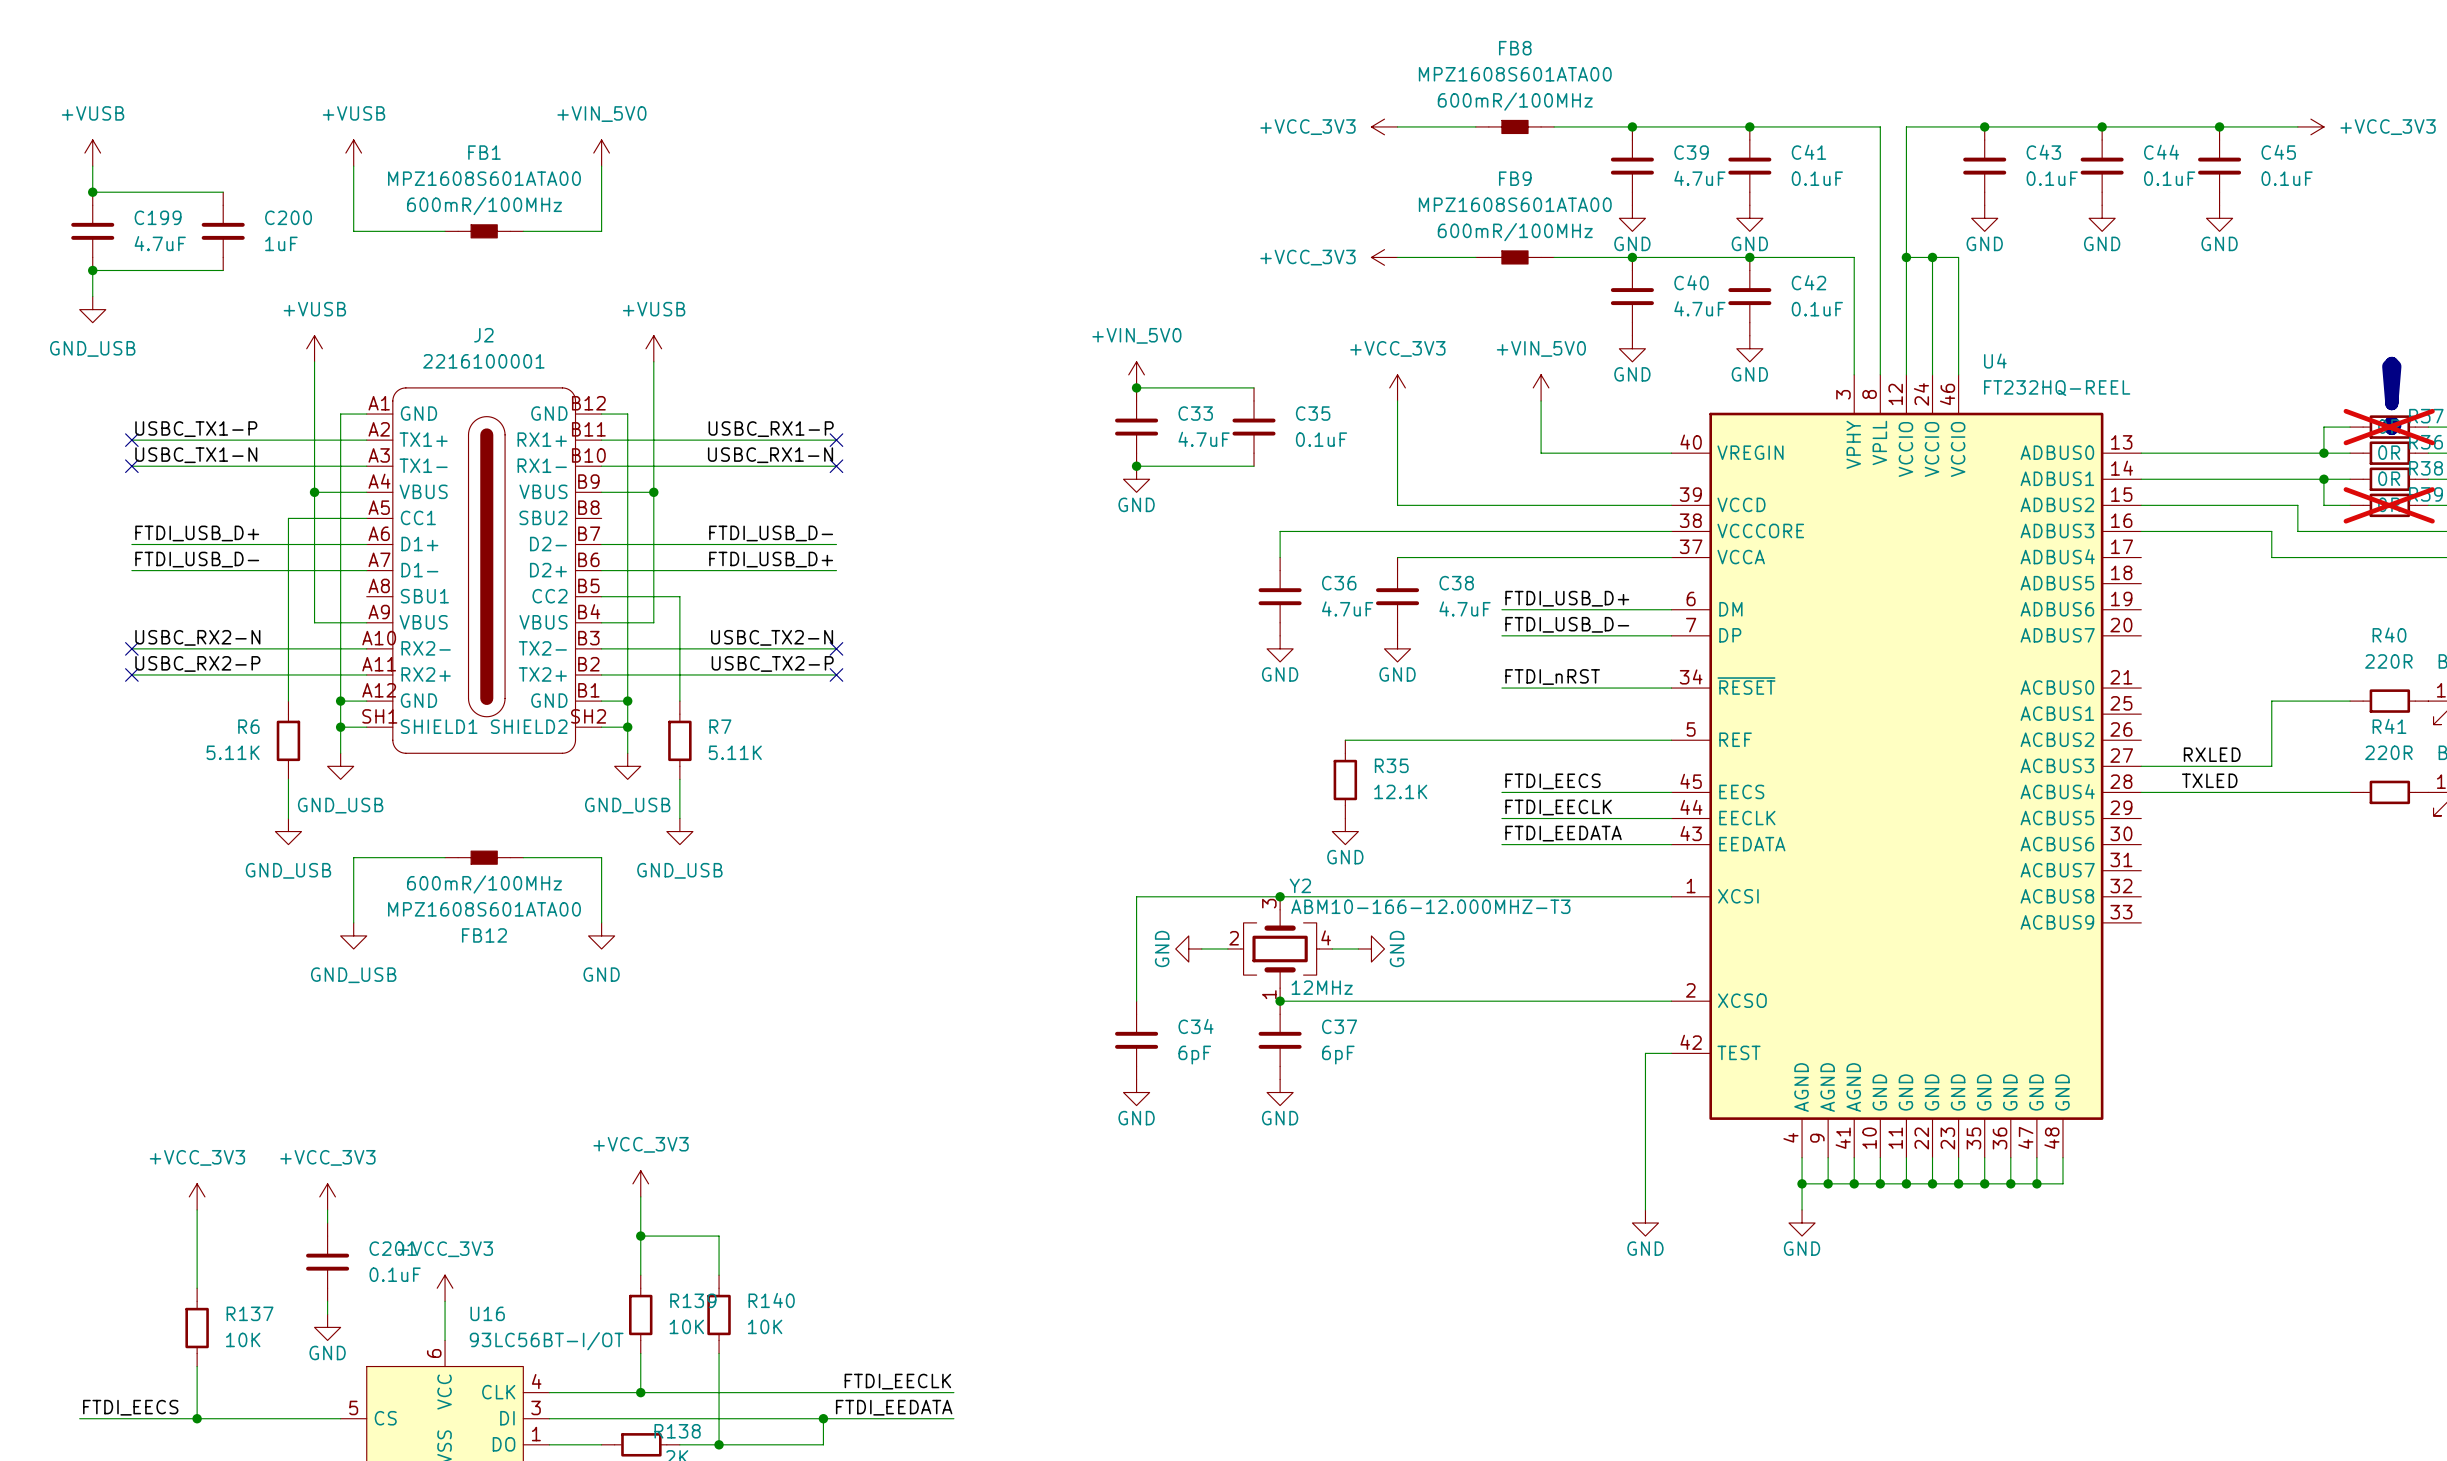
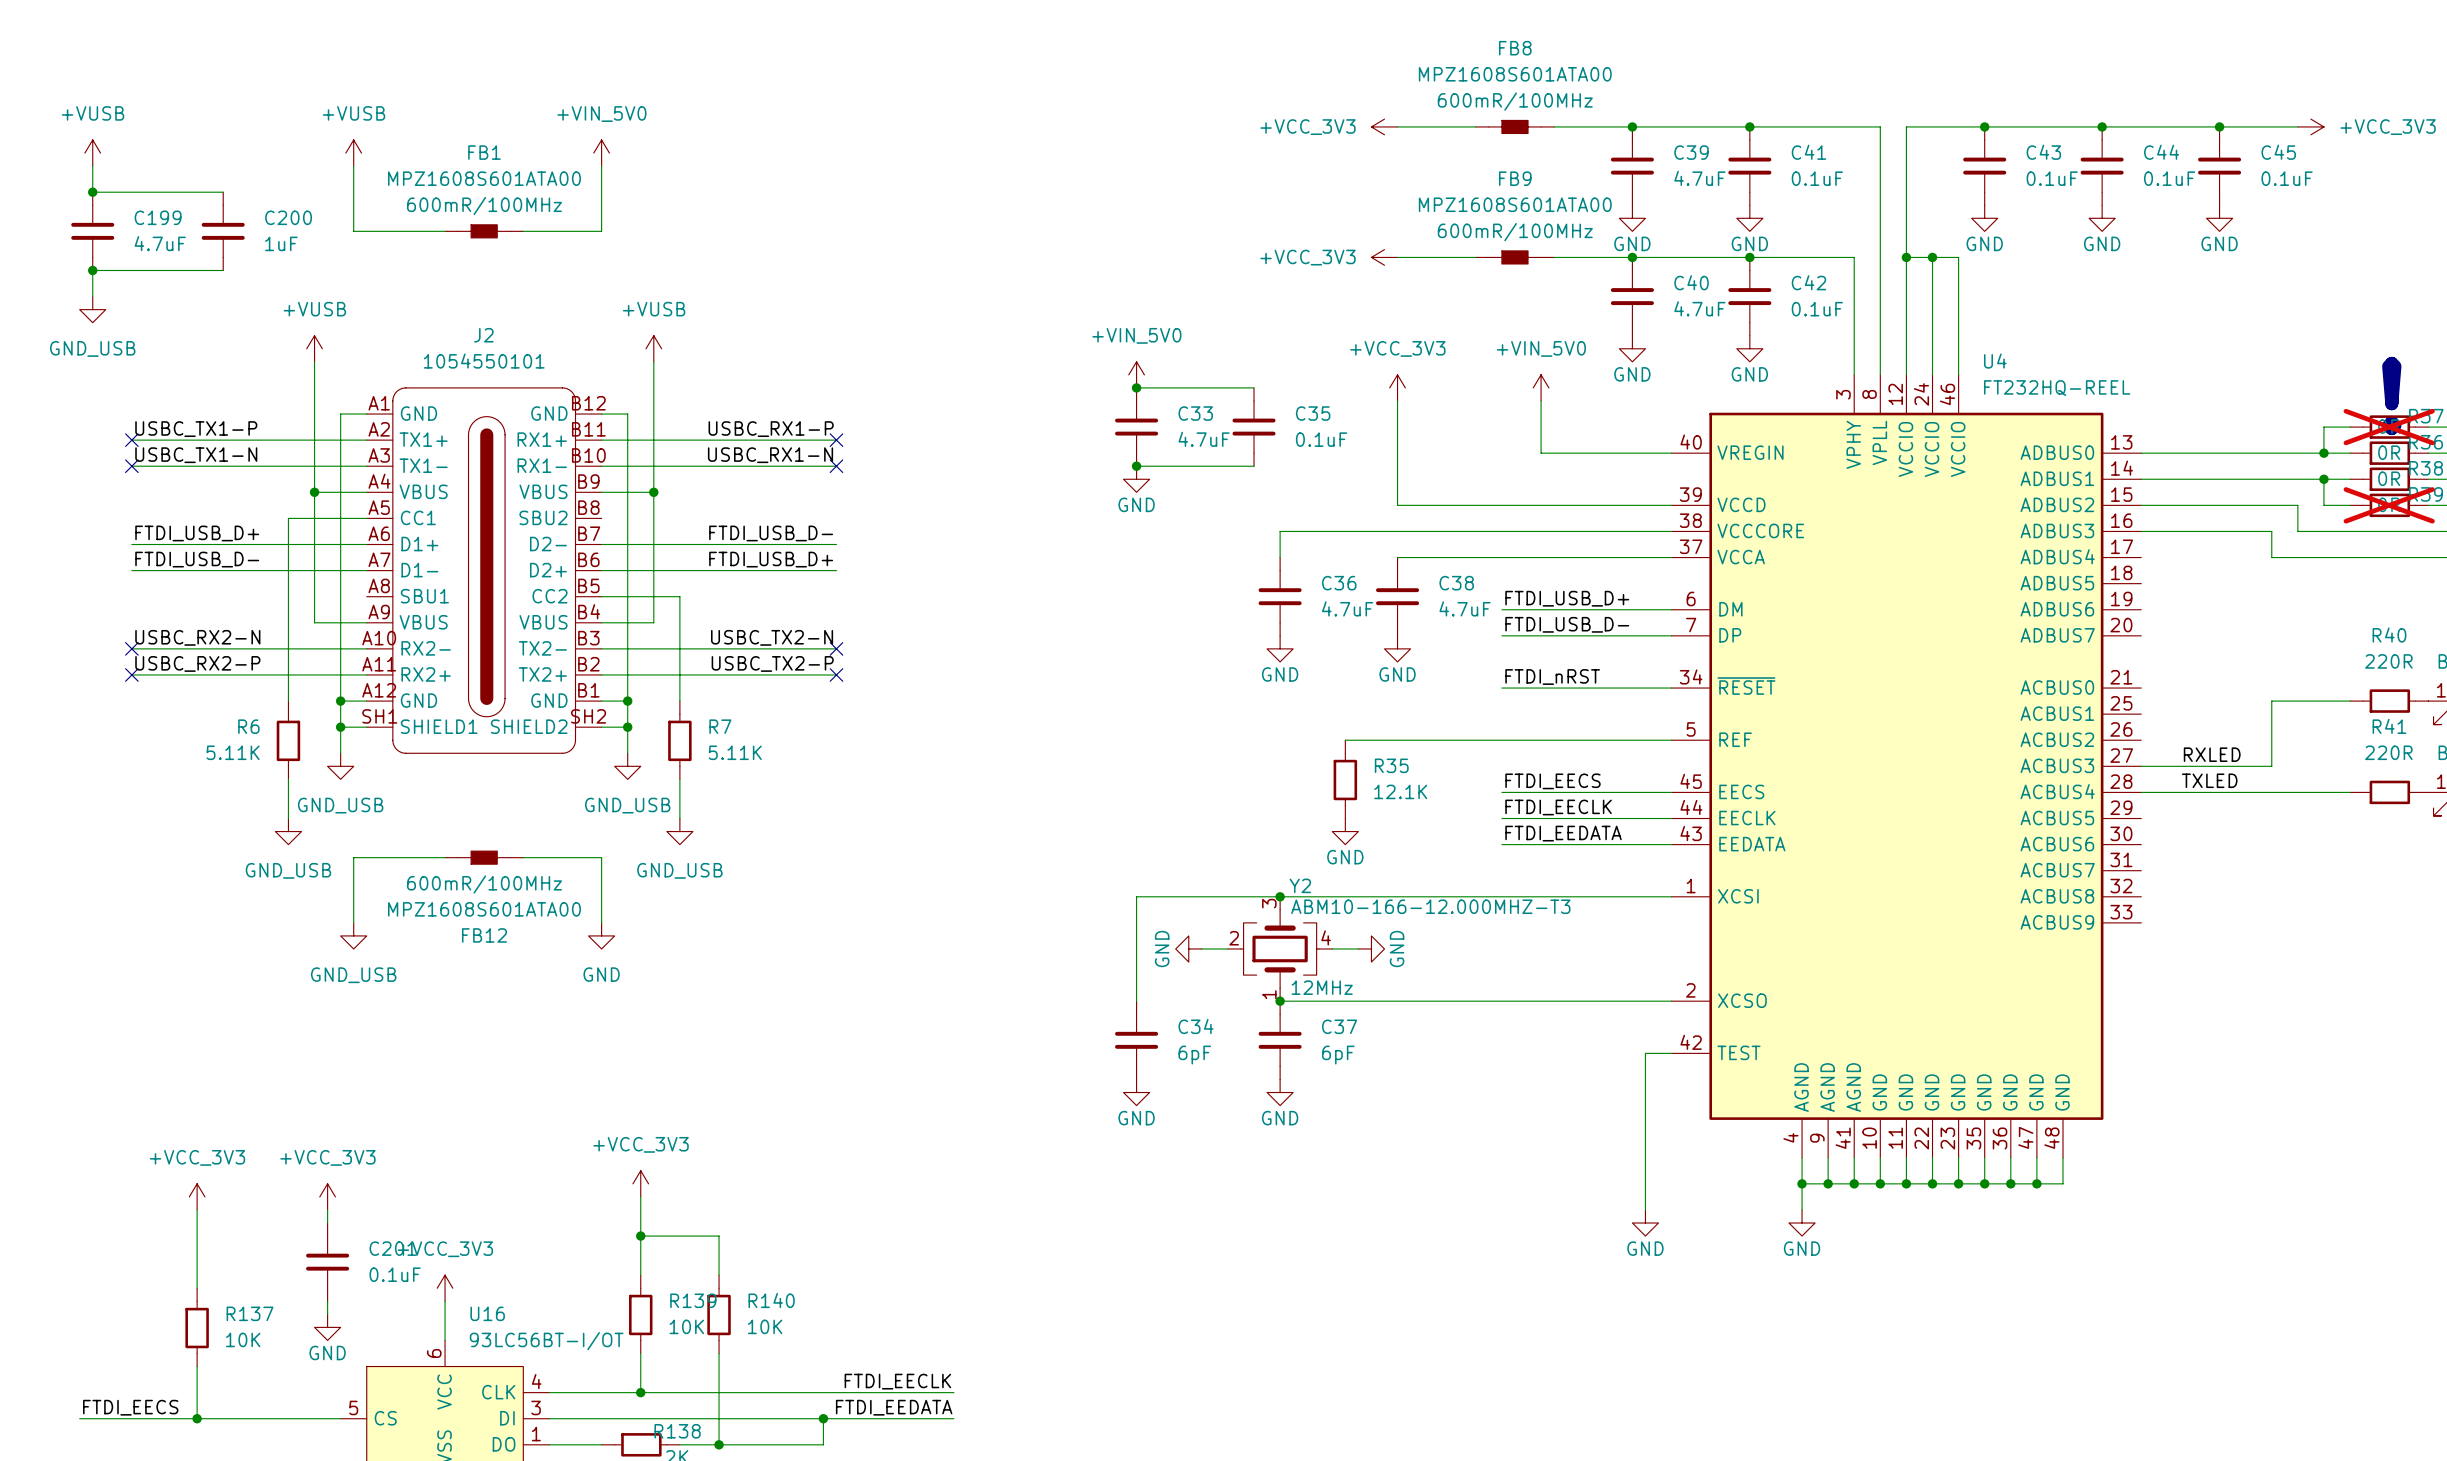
J2 value: 2216100001 (483, 361) -> 1054550101 (484, 361)

